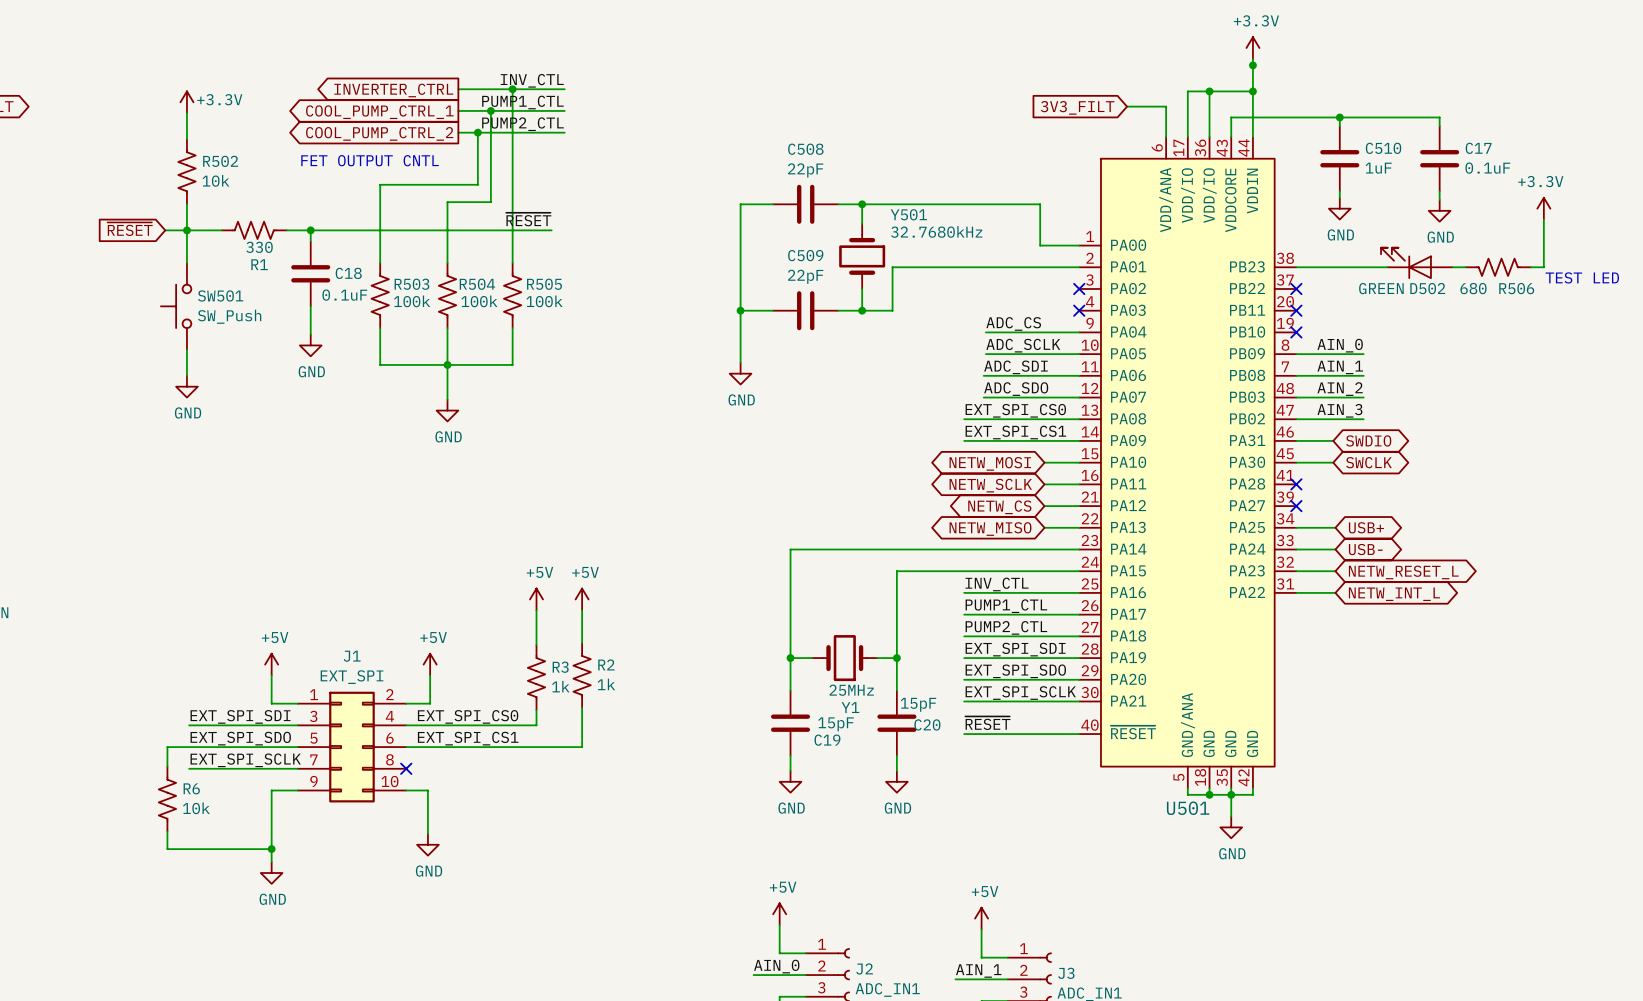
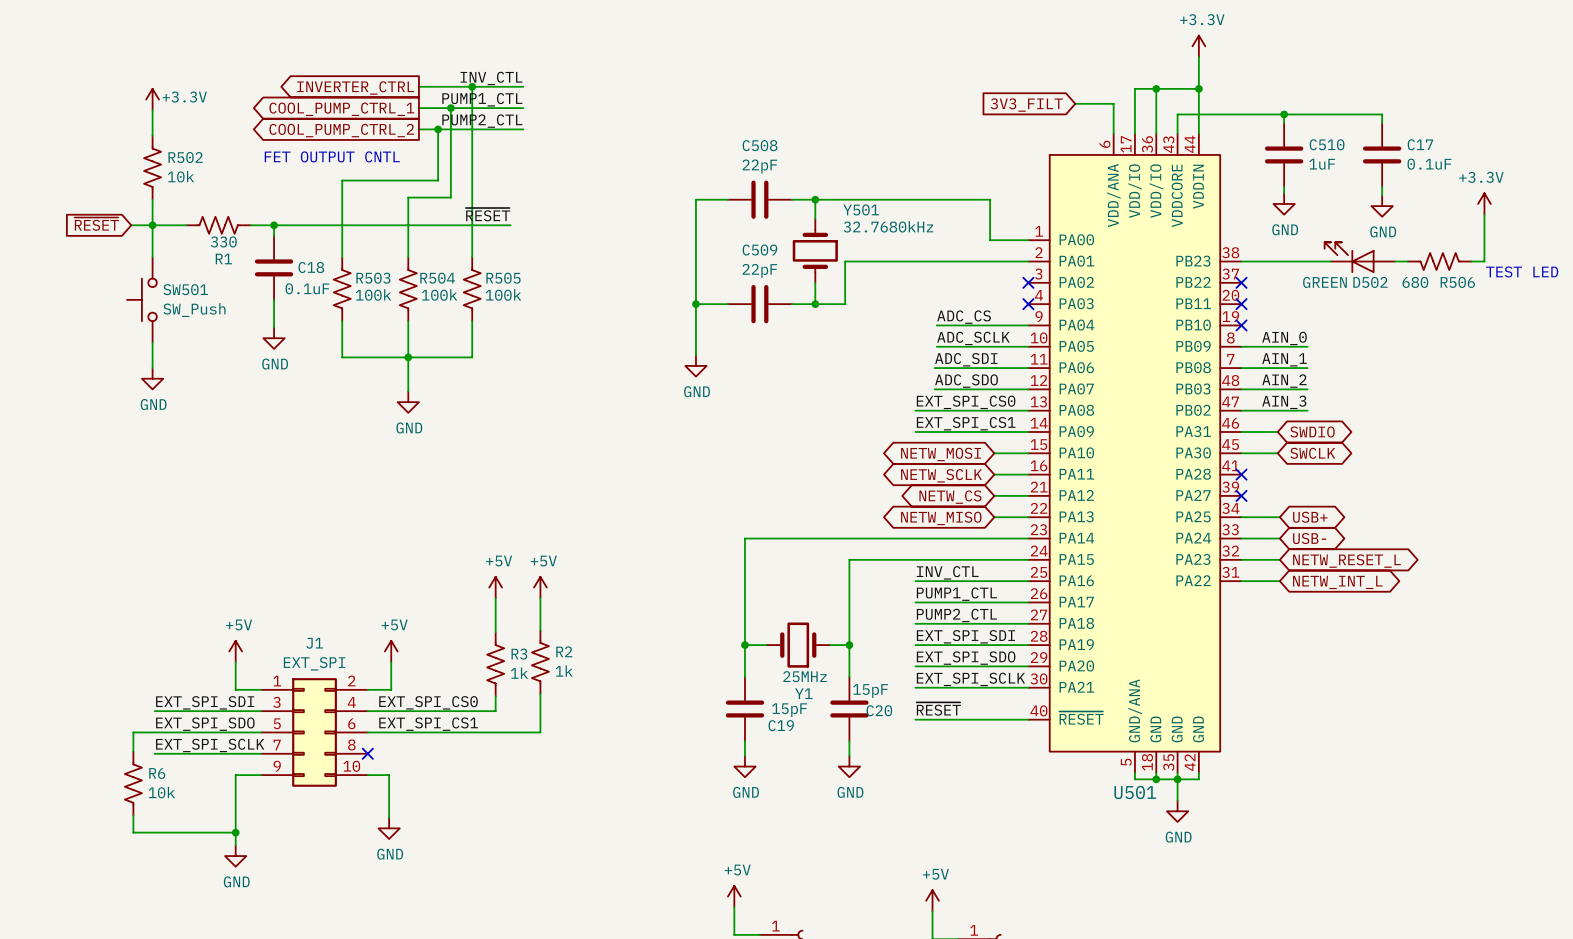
junction: (1252, 65) -> none

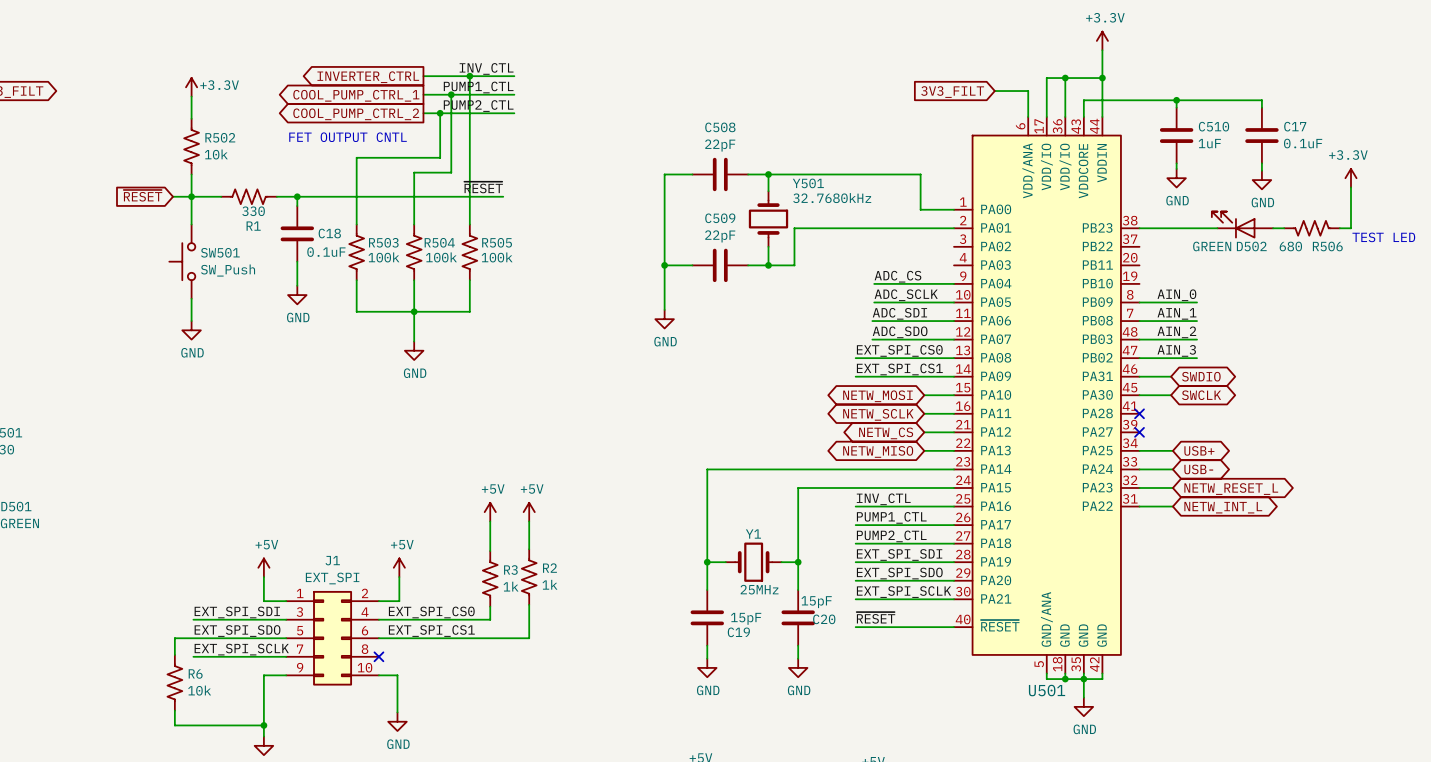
no-connect mark: (1028, 282) -> none
no-connect mark: (1241, 282) -> none
no-connect mark: (1028, 304) -> none
no-connect mark: (1241, 304) -> none
no-connect mark: (1241, 325) -> none
Y1 name position: Y1 (803, 693) -> Y1 (753, 534)

